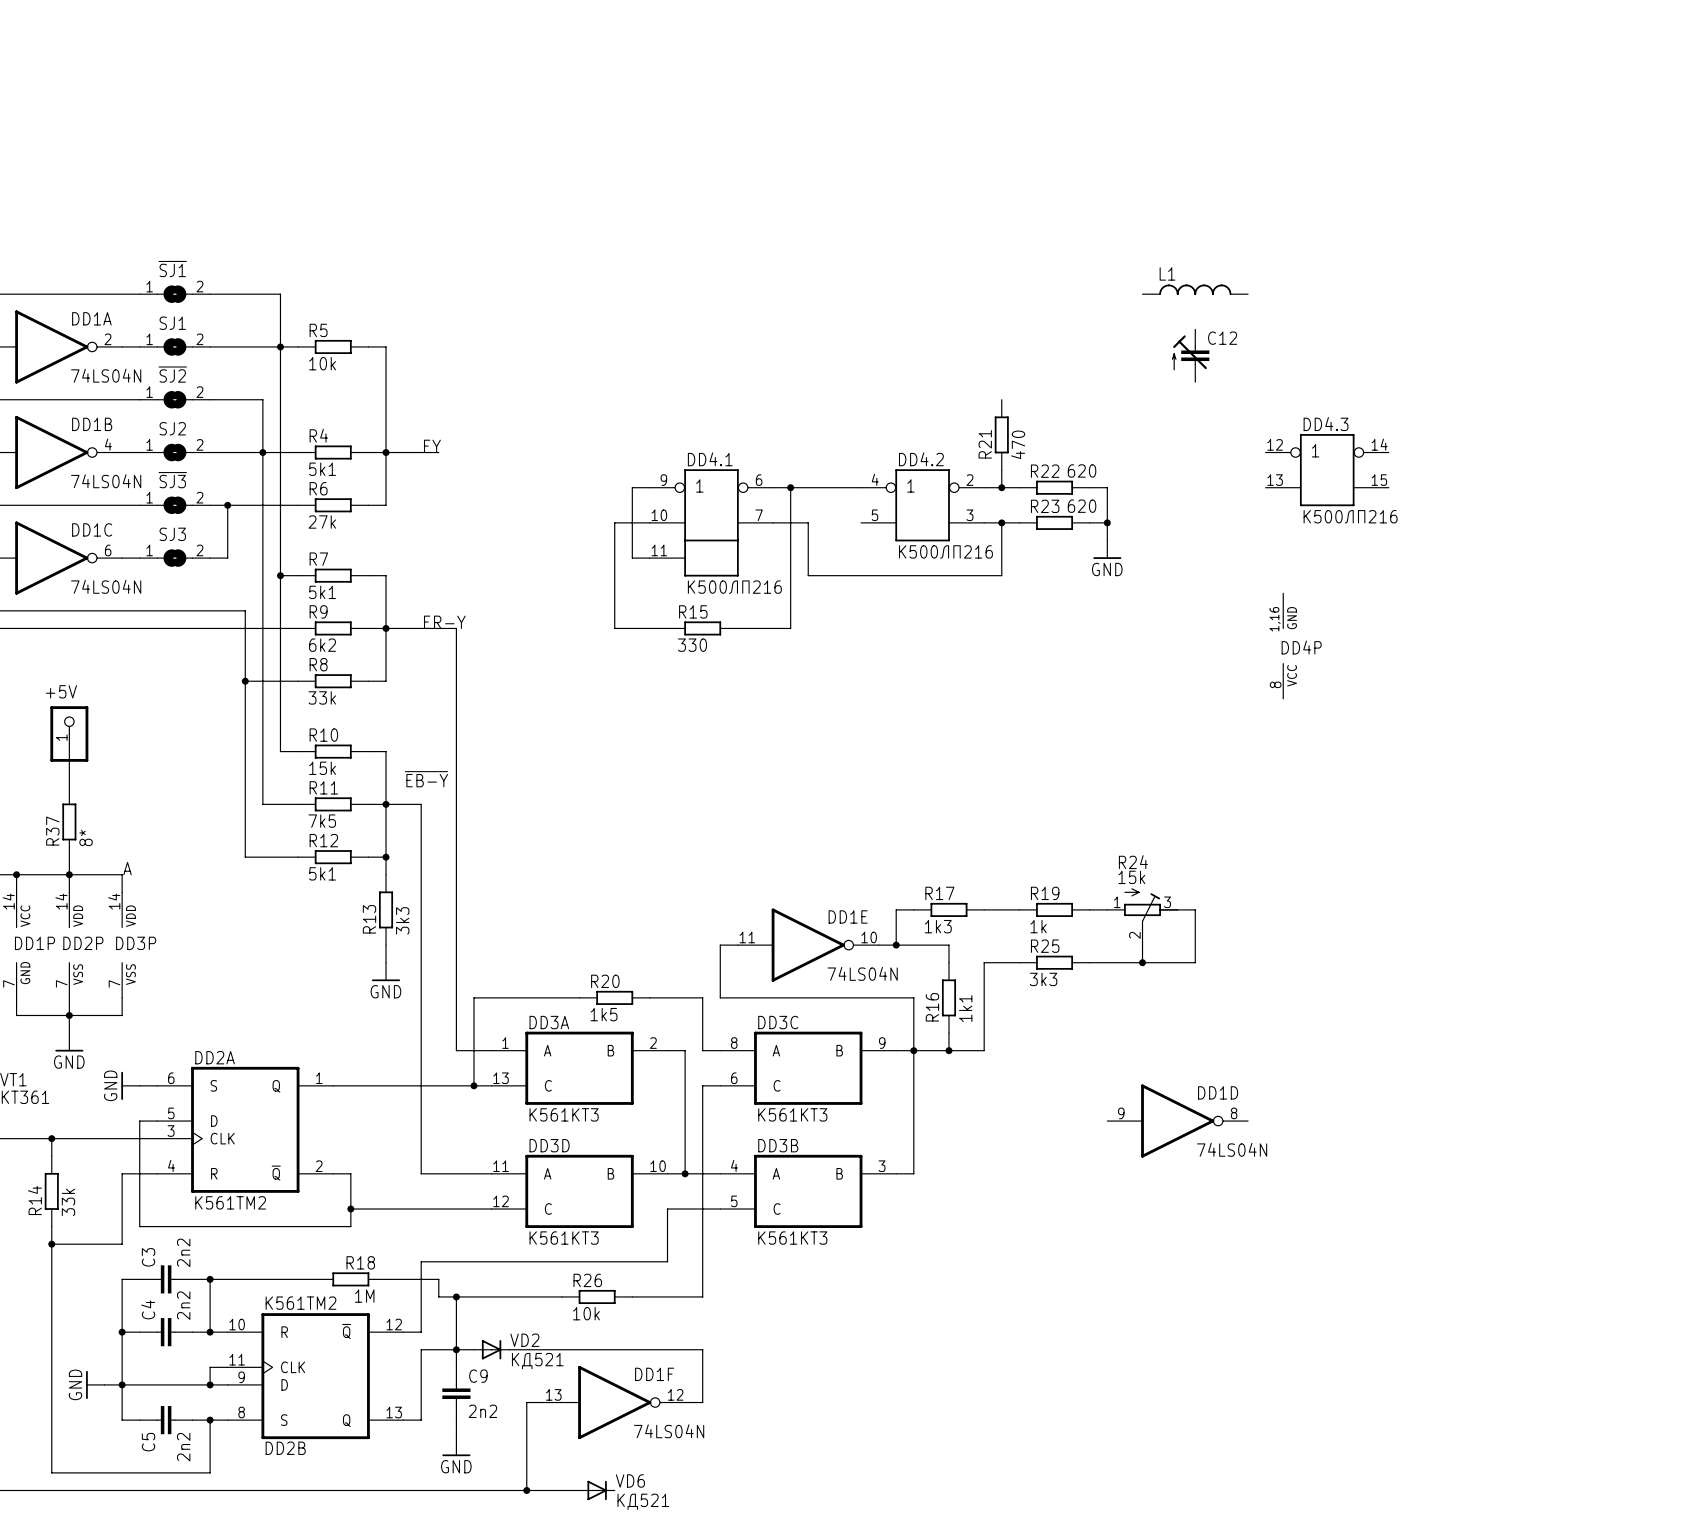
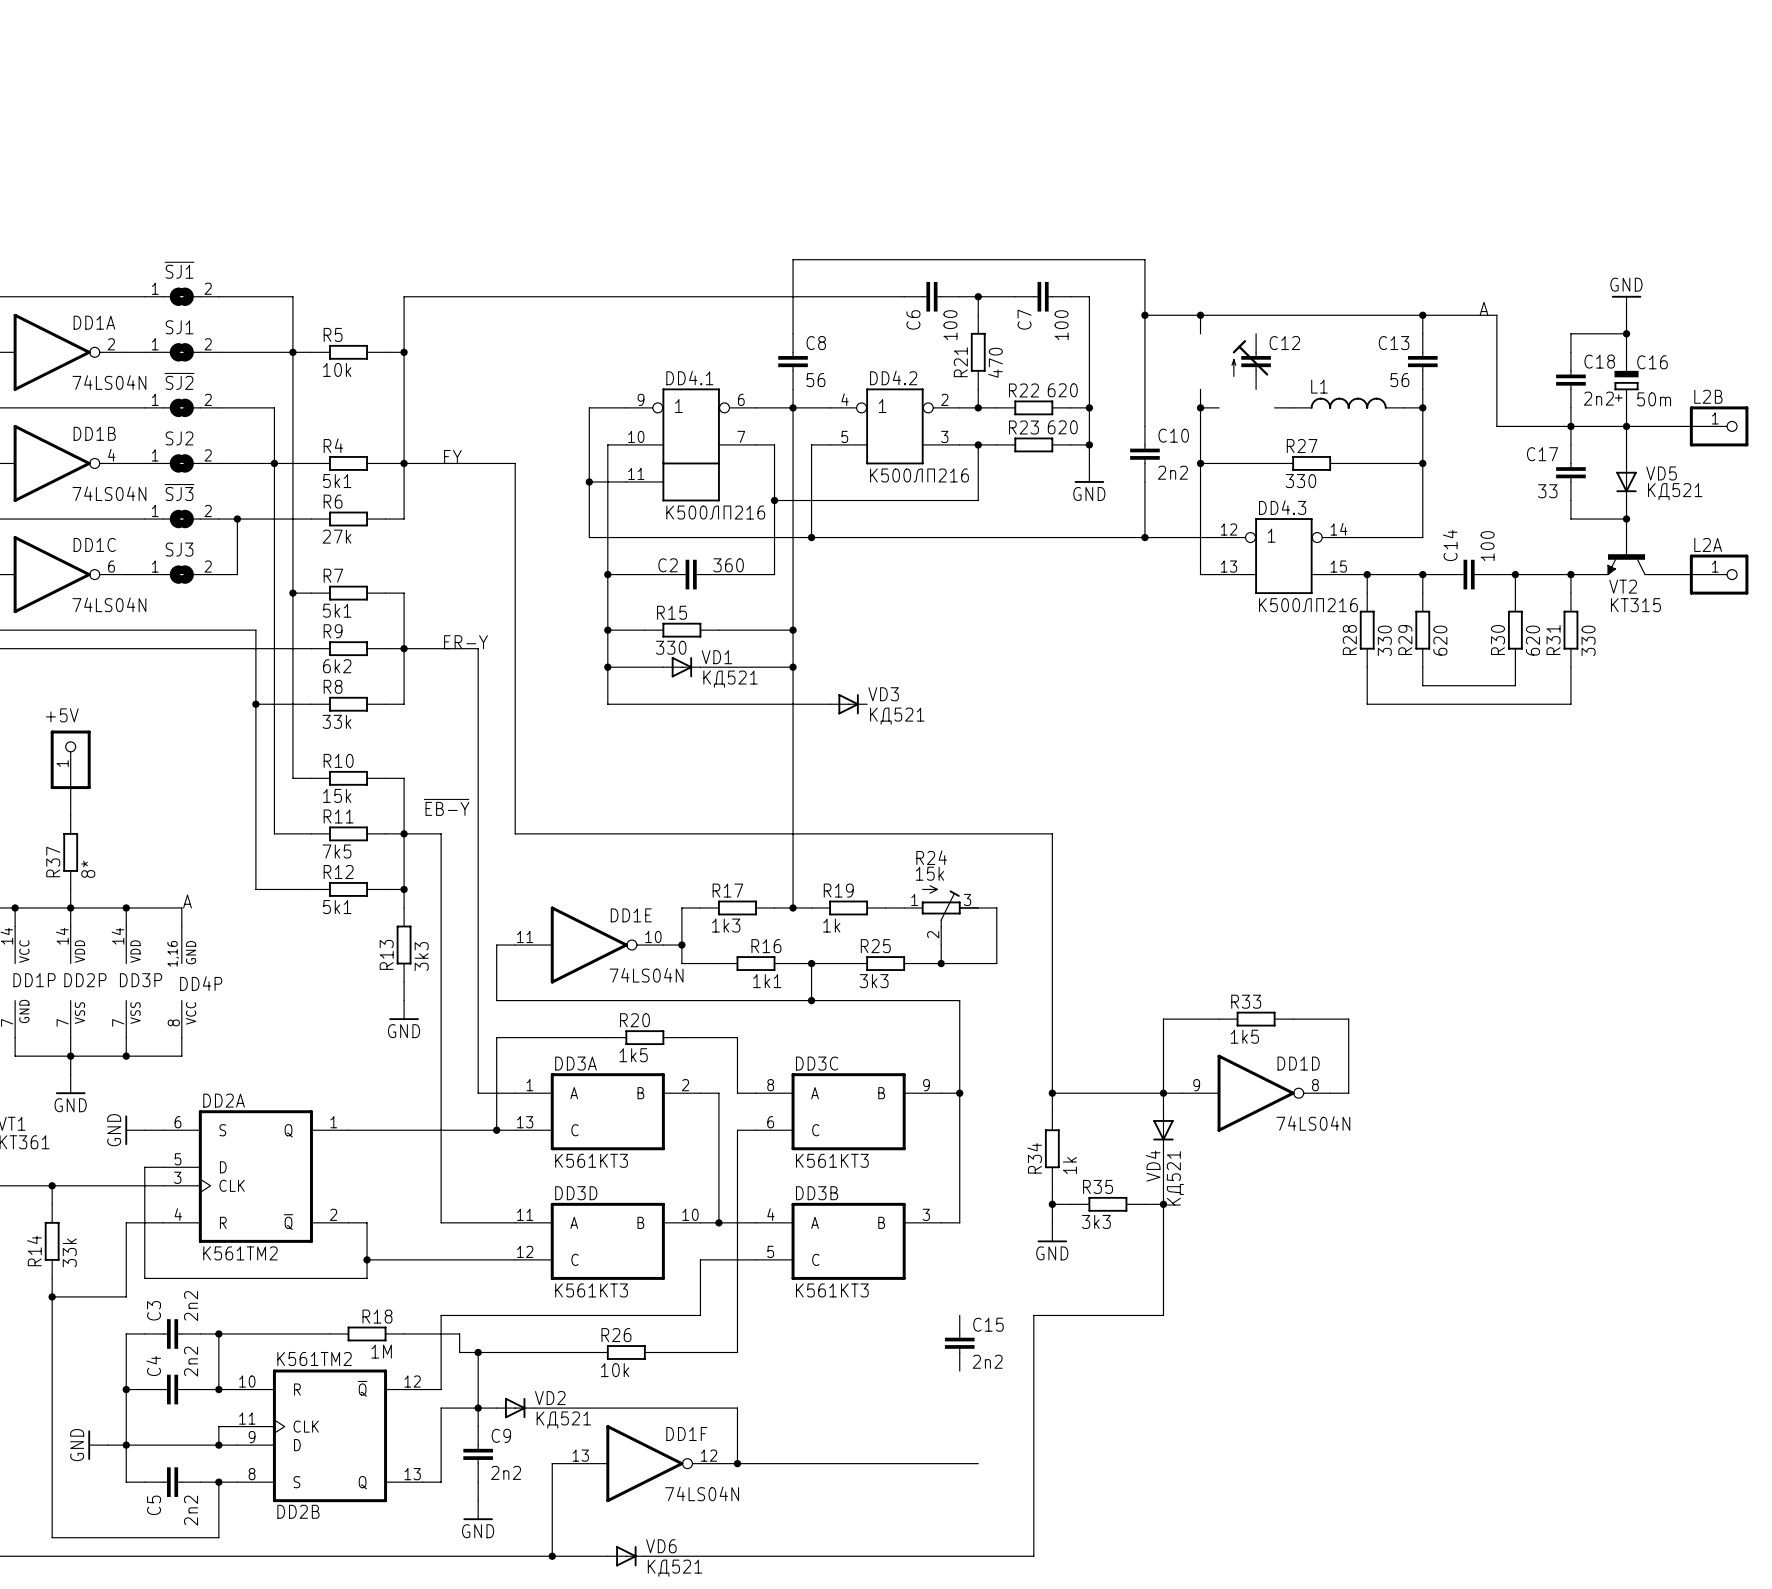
L1 position: (1195, 289) -> (1348, 403)
wire: none -> (904, 296) (404, 296) (404, 352)
C6: none -> 100 (931, 296)
wire: none -> (959, 296) (1015, 296)
wire: none -> (978, 296) (978, 315)
junction: none -> (978, 296)
C7: none -> 100 (1043, 296)
wire: none -> (1070, 296) (1089, 296) (1089, 463)
power symbol: none -> GND (1626, 305)
label: none -> A (1484, 308)
wire: none -> (1144, 315) (1496, 315) (1496, 426) (1719, 426)
junction: none -> (1144, 315)
wire: none -> (1200, 315) (1200, 333)
junction: none -> (1200, 315)
wire: none -> (1422, 315) (1422, 333)
junction: none -> (1422, 315)
wire: none -> (1626, 315) (1626, 352)
wire: none -> (793, 333) (793, 259) (1144, 259) (1144, 426)
wire: none -> (1626, 333) (1570, 333) (1570, 352)
junction: none -> (1626, 333)
junction: none -> (404, 352)
C8: none -> 56 (793, 361)
C13: none -> 56 (1422, 361)
C18: none -> 2n2 (1570, 380)
C16: none -> 50m (1626, 380)
wire: none -> (793, 389) (793, 907)
wire: none -> (1200, 389) (1200, 574) (1219, 574)
wire: none -> (1422, 389) (1422, 537) (1348, 537)
wire: none -> (755, 407) (830, 407)
junction: none -> (793, 407)
junction: none -> (978, 407)
wire: none -> (1070, 407) (1089, 407)
junction: none -> (1089, 407)
wire: none -> (1200, 407) (1219, 407)
junction: none -> (1200, 407)
wire: none -> (1274, 407) (1293, 407)
wire: none -> (1404, 407) (1422, 407)
junction: none -> (1422, 407)
wire: none -> (1570, 407) (1570, 444)
wire: none -> (1626, 407) (1626, 463)
junction: none -> (1570, 426)
junction: none -> (1626, 426)
L2B: none -> (1719, 426)
wire: none -> (626, 444) (607, 444) (607, 704) (830, 704)
wire: none -> (755, 444) (774, 444) (774, 574) (718, 574)
wire: none -> (830, 444) (811, 444) (811, 537) (681, 537)
wire: none -> (959, 444) (996, 444)
wire: none -> (978, 444) (978, 500) (904, 500)
junction: none -> (978, 444)
R21 position: (1001, 434) -> (978, 352)
wire: none -> (1070, 444) (1089, 444)
junction: none -> (1089, 444)
C10: none -> 2n2 (1144, 454)
wire: none -> (459, 463) (515, 463) (515, 833) (1052, 833) (1052, 1111)
wire: none -> (1200, 463) (1274, 463)
junction: none -> (1200, 463)
R27: none -> 330 (1311, 463)
wire: none -> (1348, 463) (1422, 463)
junction: none -> (1422, 463)
C17: none -> 33 (1570, 472)
wire: none -> (589, 481) (626, 481)
junction: none -> (589, 481)
wire: (1001, 470) (1001, 487) -> (978, 389) (978, 407)
wire: none -> (1144, 481) (1144, 537) (1070, 537)
DD4.3 position: (1327, 470) -> (1283, 556)
VD5: none -> КД521 (1626, 481)
wire: (649, 487) (632, 487) (632, 558) (649, 558) -> none
junction: none -> (774, 500)
wire: (790, 487) (790, 628) (737, 628) -> none
junction: (790, 487) -> none
wire: (984, 487) (1019, 487) -> (959, 407) (996, 407)
junction: (1001, 487) -> none
R22 position: (1054, 487) -> (1033, 407)
wire: (1089, 487) (1107, 487) (1107, 540) -> none
wire: none -> (1570, 500) (1570, 519) (1626, 519)
wire: none -> (1626, 500) (1626, 537)
DD4.2 position: (922, 505) -> (894, 426)
junction: none -> (1626, 519)
wire: (614, 522) (614, 628) (667, 628) -> (644, 537) (589, 537) (589, 407) (626, 407)
DD4.1 position: (711, 522) -> (691, 444)
junction: none -> (811, 537)
wire: (808, 522) (808, 575) (1001, 575) (1001, 522) -> (848, 537) (1033, 537)
junction: (1001, 522) -> none
R23 position: (1054, 522) -> (1033, 444)
wire: none -> (1163, 537) (1219, 537)
junction position: (1107, 522) -> (1144, 537)
VT2: none -> КТ315 (1626, 556)
power symbol position: GND (1107, 549) -> GND (1089, 473)
wire: none -> (607, 574) (663, 574)
junction: none -> (607, 574)
C2: none -> 360 (691, 574)
wire: none -> (1348, 574) (1441, 574)
wire: none -> (1367, 574) (1367, 593)
junction: none -> (1367, 574)
wire: none -> (1422, 574) (1422, 593)
junction: none -> (1422, 574)
C14: none -> 100 (1469, 574)
wire: none -> (1496, 574) (1589, 574)
wire: none -> (1515, 574) (1515, 593)
junction: none -> (1515, 574)
wire: none -> (1570, 574) (1570, 593)
junction: none -> (1570, 574)
wire: none -> (1663, 574) (1719, 574)
L2A: none -> (1719, 574)
wire: none -> (607, 630) (644, 630)
junction: none -> (607, 630)
wire: none -> (718, 630) (793, 630)
junction: none -> (793, 630)
R28: none -> 330 (1367, 630)
R29: none -> 620 (1422, 630)
R30: none -> 620 (1515, 630)
R31: none -> 330 (1570, 630)
R15 position: (702, 628) -> (681, 630)
wire: none -> (607, 667) (663, 667)
junction: none -> (607, 667)
VD1: none -> КД521 (681, 667)
wire: none -> (700, 667) (793, 667)
junction: none -> (793, 667)
DD4P position: (1283, 646) -> (181, 982)
wire: none -> (1367, 667) (1367, 704) (1570, 704) (1570, 667)
wire: none -> (1422, 667) (1422, 685) (1515, 685) (1515, 667)
VD3: none -> КД521 (848, 704)
label position: A (127, 868) -> A (187, 901)
wire: none -> (126, 907) (181, 907) (181, 926)
junction: none -> (126, 907)
wire: none -> (700, 907) (681, 907) (681, 963) (718, 963)
wire: none -> (774, 907) (811, 907)
junction: none -> (793, 907)
wire: none -> (978, 907) (996, 907) (996, 963) (922, 963)
wire: none -> (663, 945) (681, 945)
junction: none -> (681, 945)
wire: (896, 909) (913, 909) -> (885, 907) (904, 907)
R17 position: (948, 909) -> (737, 907)
wire: (984, 909) (1019, 909) -> none
R19 position: (1054, 909) -> (848, 907)
wire: (1089, 909) (1107, 909) -> none
wire: (1177, 909) (1195, 909) (1195, 962) (1089, 962) -> none
R24 position: (1142, 916) -> (941, 915)
wire: none -> (793, 963) (848, 963)
junction: none -> (811, 963)
wire: (896, 927) (896, 945) -> none
wire: (737, 945) (720, 945) (720, 997) (913, 997) -> (515, 945) (496, 945) (496, 1000) (959, 1000) (959, 1037)
DD1E position: (808, 945) -> (589, 945)
wire: (878, 945) (948, 945) (948, 962) -> none
junction position: (896, 945) -> (941, 963)
wire: (1142, 945) (1142, 962) -> none
junction: none -> (811, 1000)
wire: (1019, 962) (984, 962) (984, 1050) (913, 1050) -> none
R25 position: (1054, 962) -> (885, 963)
junction: (1142, 962) -> none
wire: none -> (1219, 1019) (1163, 1019) (1163, 1111)
R33: none -> 1k5 (1256, 1019)
wire: none -> (1293, 1019) (1348, 1019) (1348, 1093) (1330, 1093)
wire: none -> (181, 1037) (181, 1056) (126, 1056)
R16 rotation: 0° (948, 997) -> 90° clockwise (755, 963)
R16 position: (948, 997) -> (755, 963)
R16 name position: R16 (932, 1007) -> R16 (766, 946)
junction: none -> (126, 1056)
wire: (948, 1033) (948, 1050) -> none
junction: (948, 1050) -> none
wire: none -> (1052, 1093) (1181, 1093)
junction: none -> (1052, 1093)
junction: none -> (1163, 1093)
VD4: none -> КД521 (1163, 1130)
R34: none -> 1k (1052, 1148)
wire: none -> (1163, 1148) (1163, 1315) (1033, 1315) (1033, 1556) (644, 1556)
DD1D position: (1177, 1121) -> (1256, 1093)
wire: none -> (1052, 1185) (1052, 1222)
wire: none -> (1052, 1204) (1070, 1204)
junction: none -> (1052, 1204)
R35: none -> 3k3 (1107, 1204)
wire: none -> (1144, 1204) (1163, 1204)
junction: none -> (1163, 1204)
power symbol: none -> GND (1052, 1232)
C15: none -> 2n2 (959, 1343)
wire: none -> (737, 1463) (978, 1463)
junction: none -> (737, 1463)

